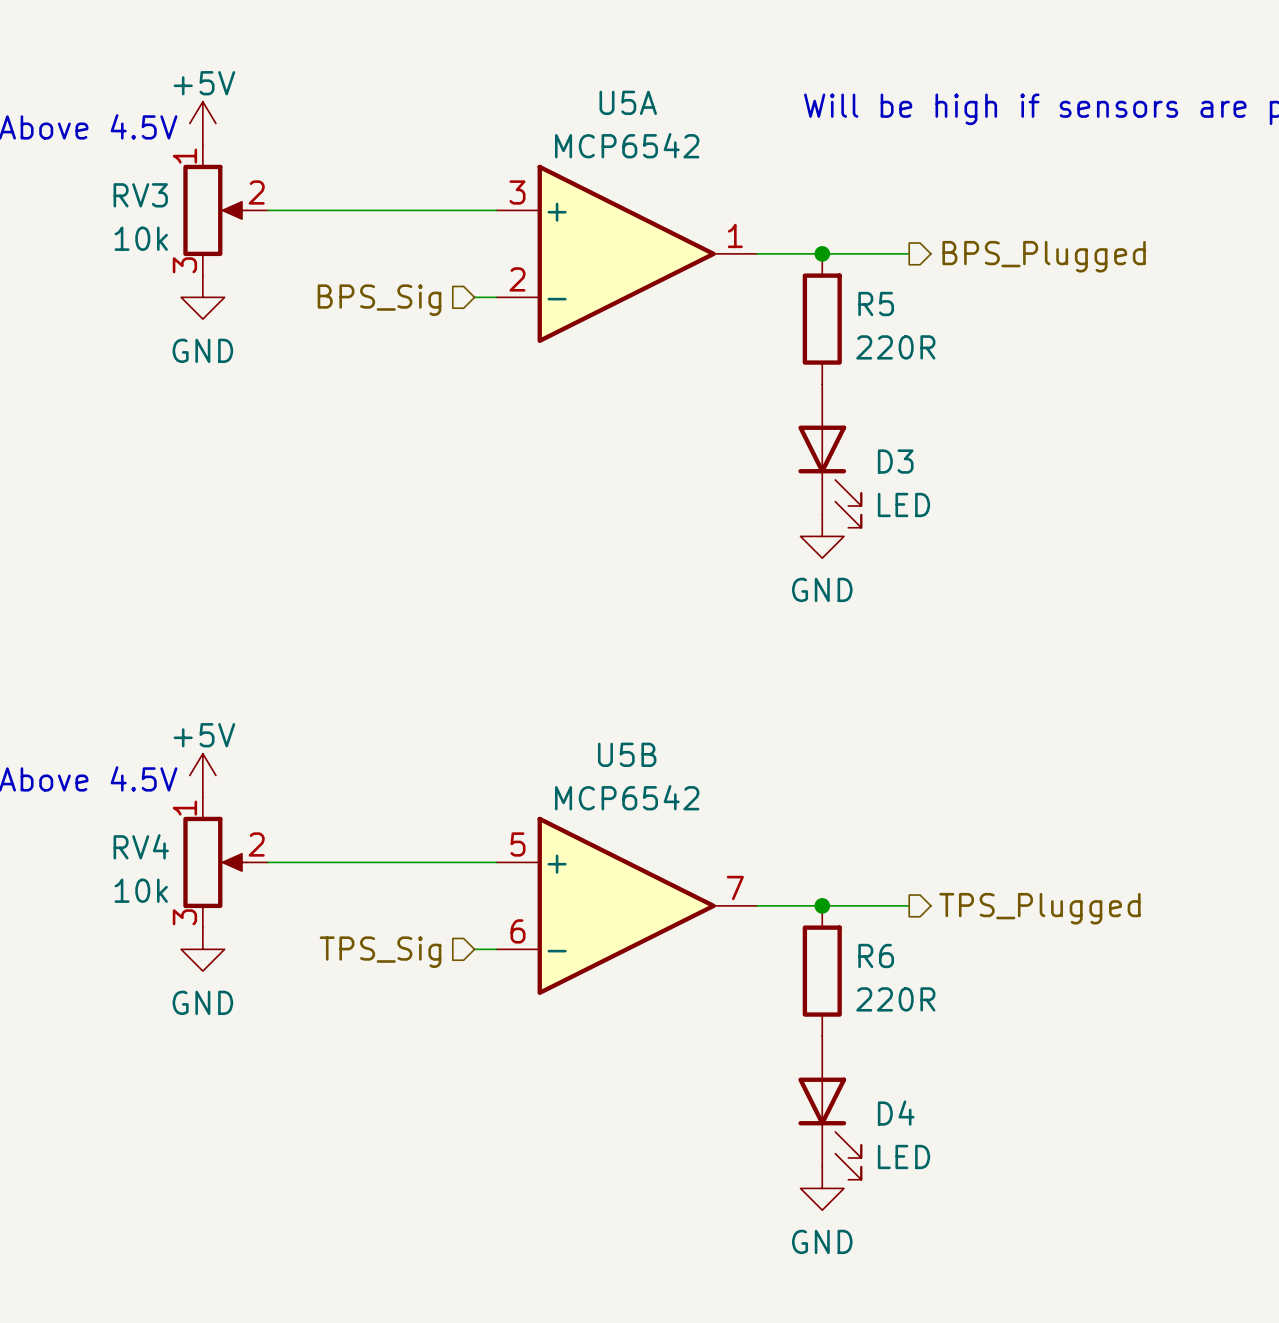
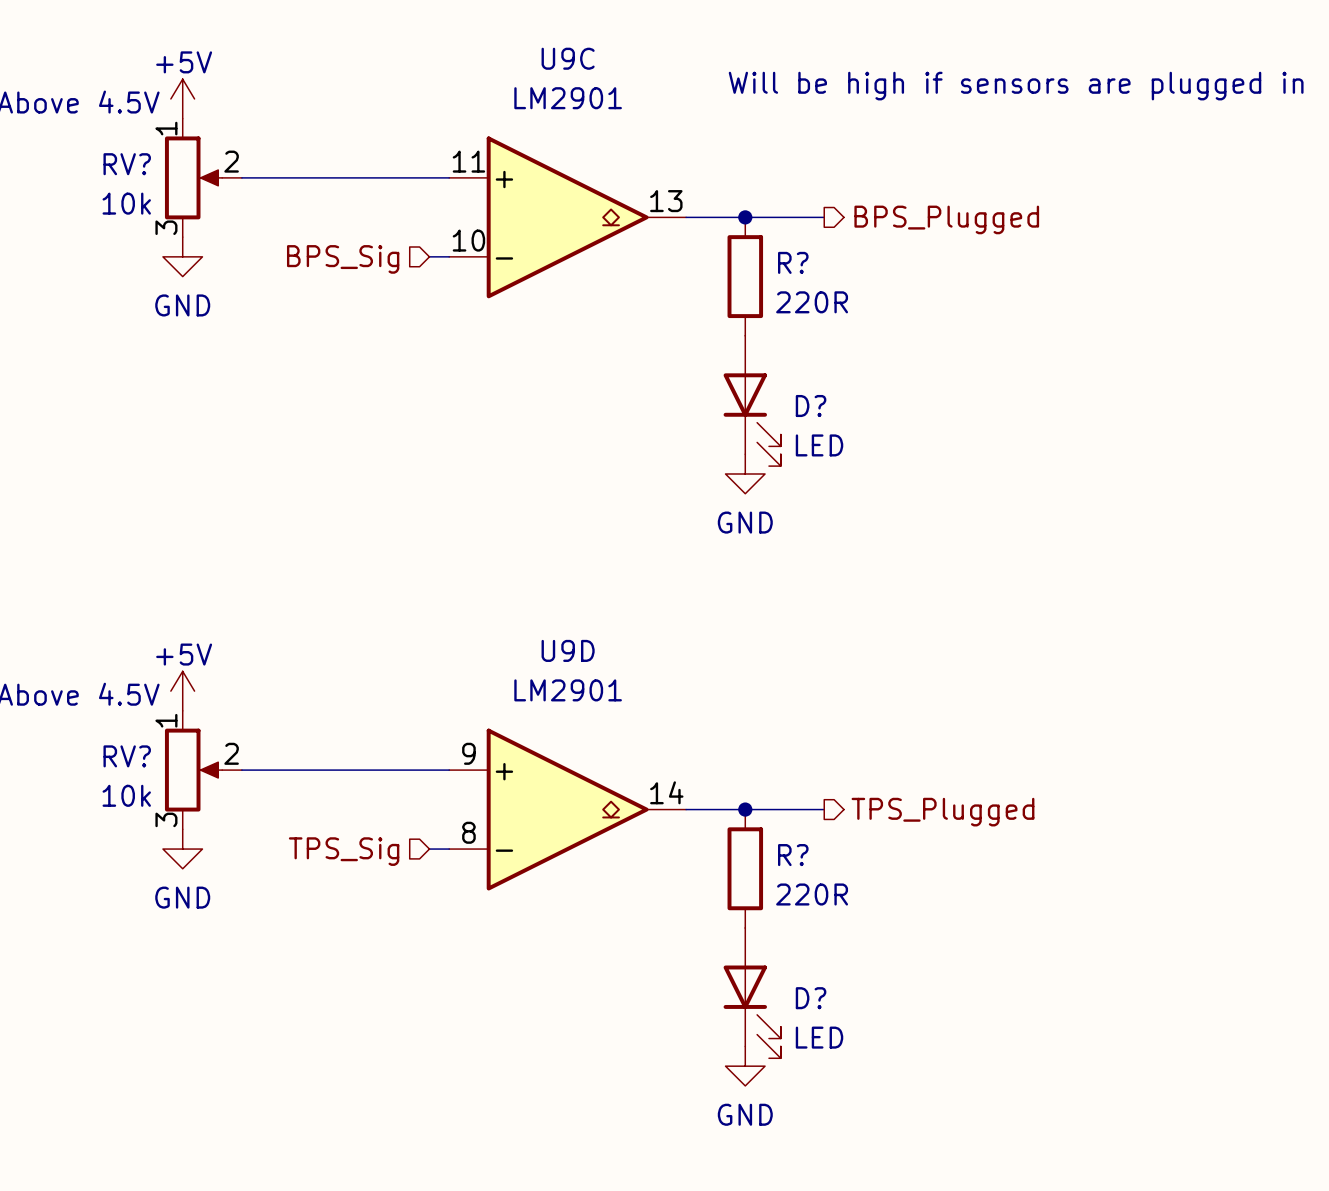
RV3 name: RV3 (140, 195) -> RV? (127, 164)
U5A: MCP6542 (626, 253) -> none
U9C: none -> LM2901 (567, 217)
R5 name: R5 (876, 303) -> R? (793, 262)
D3 name: D3 (895, 461) -> D? (811, 406)
RV4 name: RV4 (141, 846) -> RV? (127, 756)
U5B: MCP6542 (626, 905) -> none
U9D: none -> LM2901 (567, 809)
R6 name: R6 (876, 955) -> R? (793, 855)
D4 name: D4 (896, 1113) -> D? (811, 998)

